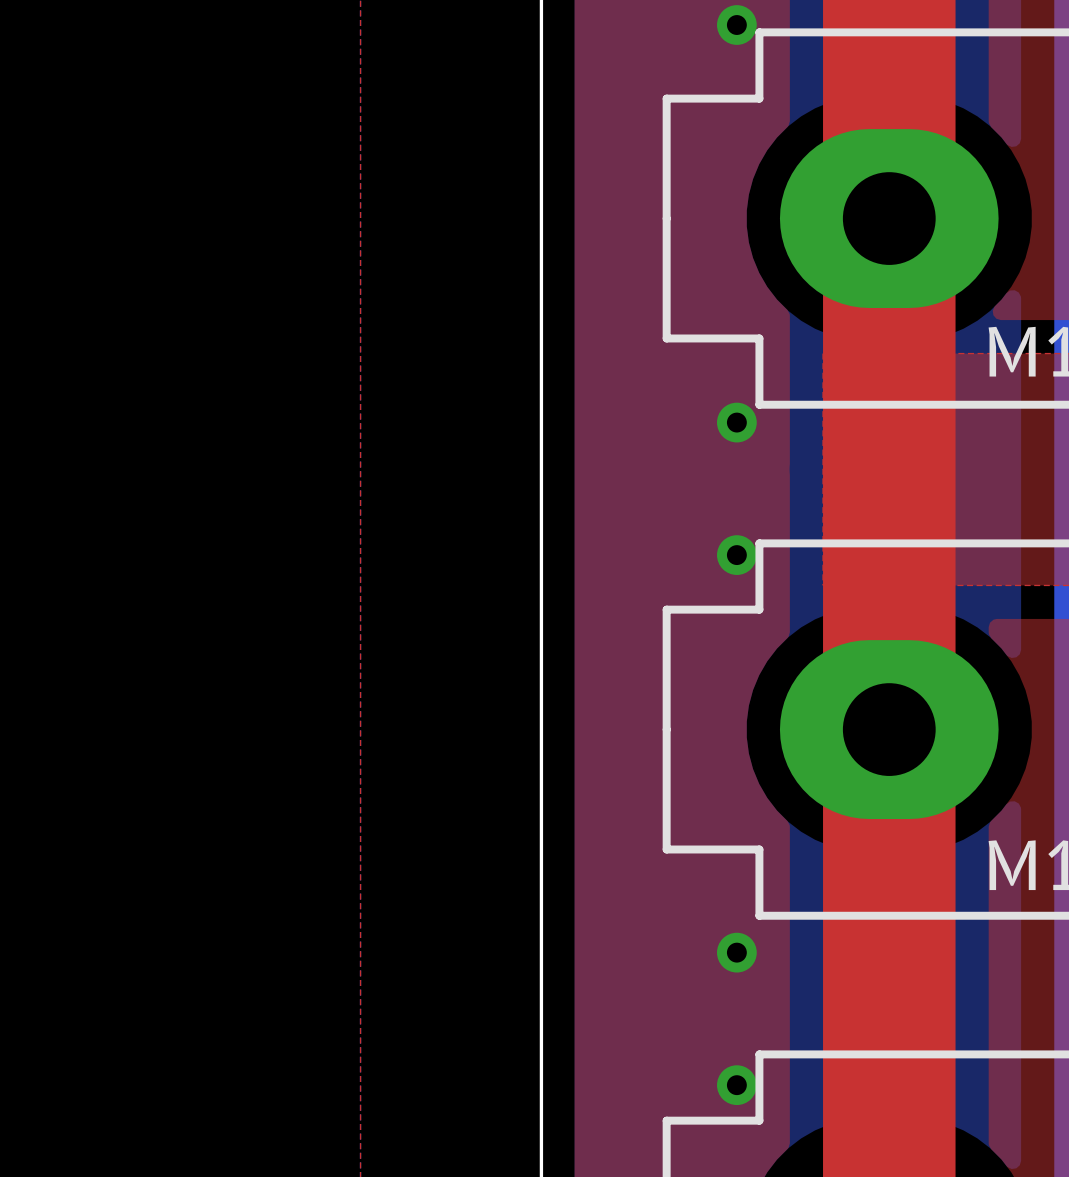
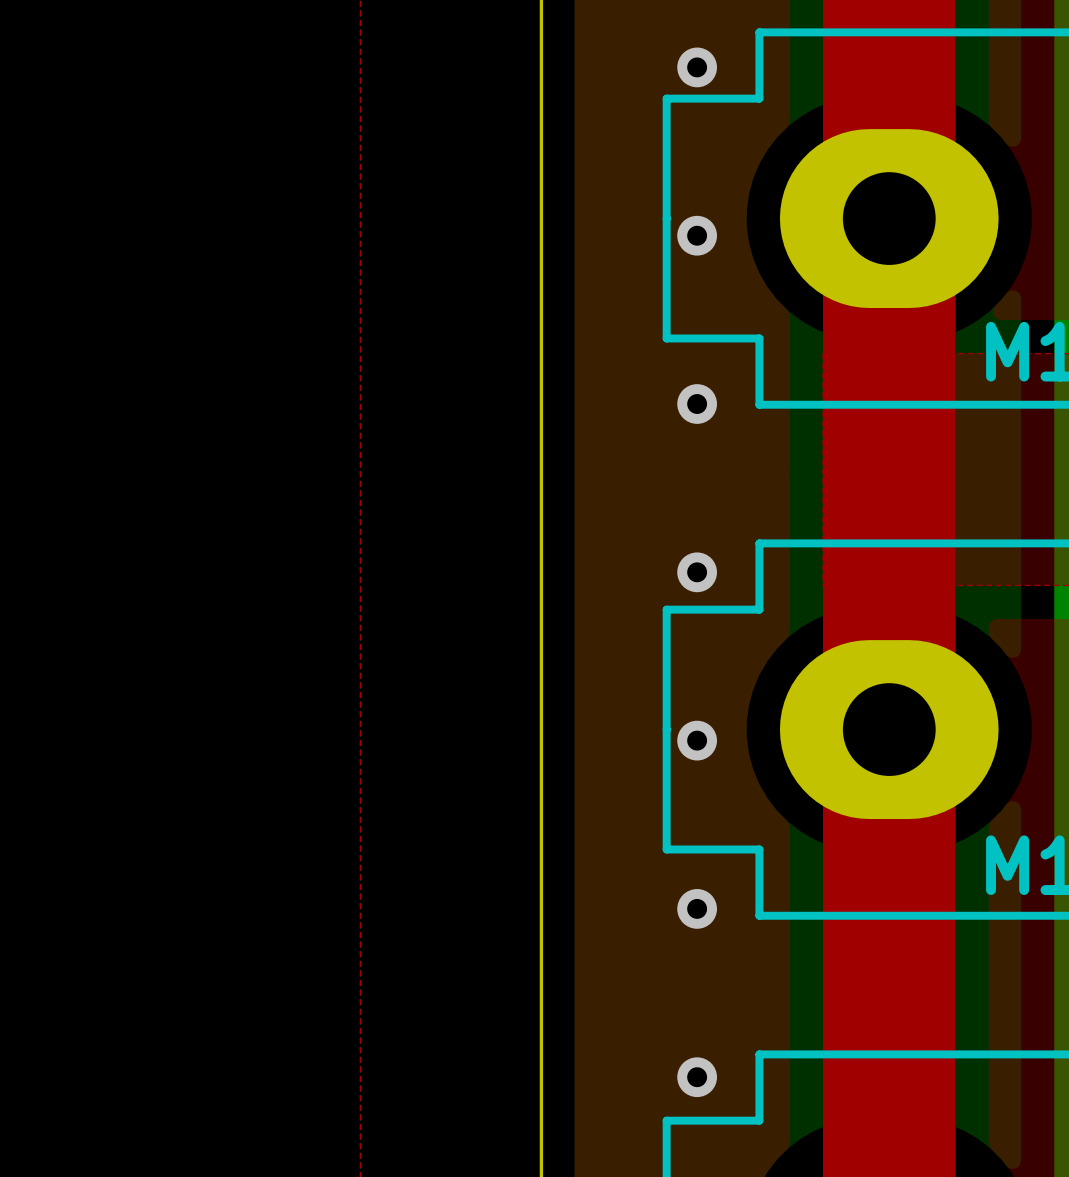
via position: (736, 25) -> (697, 67)
via: none -> (697, 235)
via position: (736, 422) -> (697, 404)
via position: (736, 555) -> (697, 572)
via: none -> (697, 740)
via position: (736, 952) -> (697, 908)
via position: (736, 1085) -> (697, 1077)

